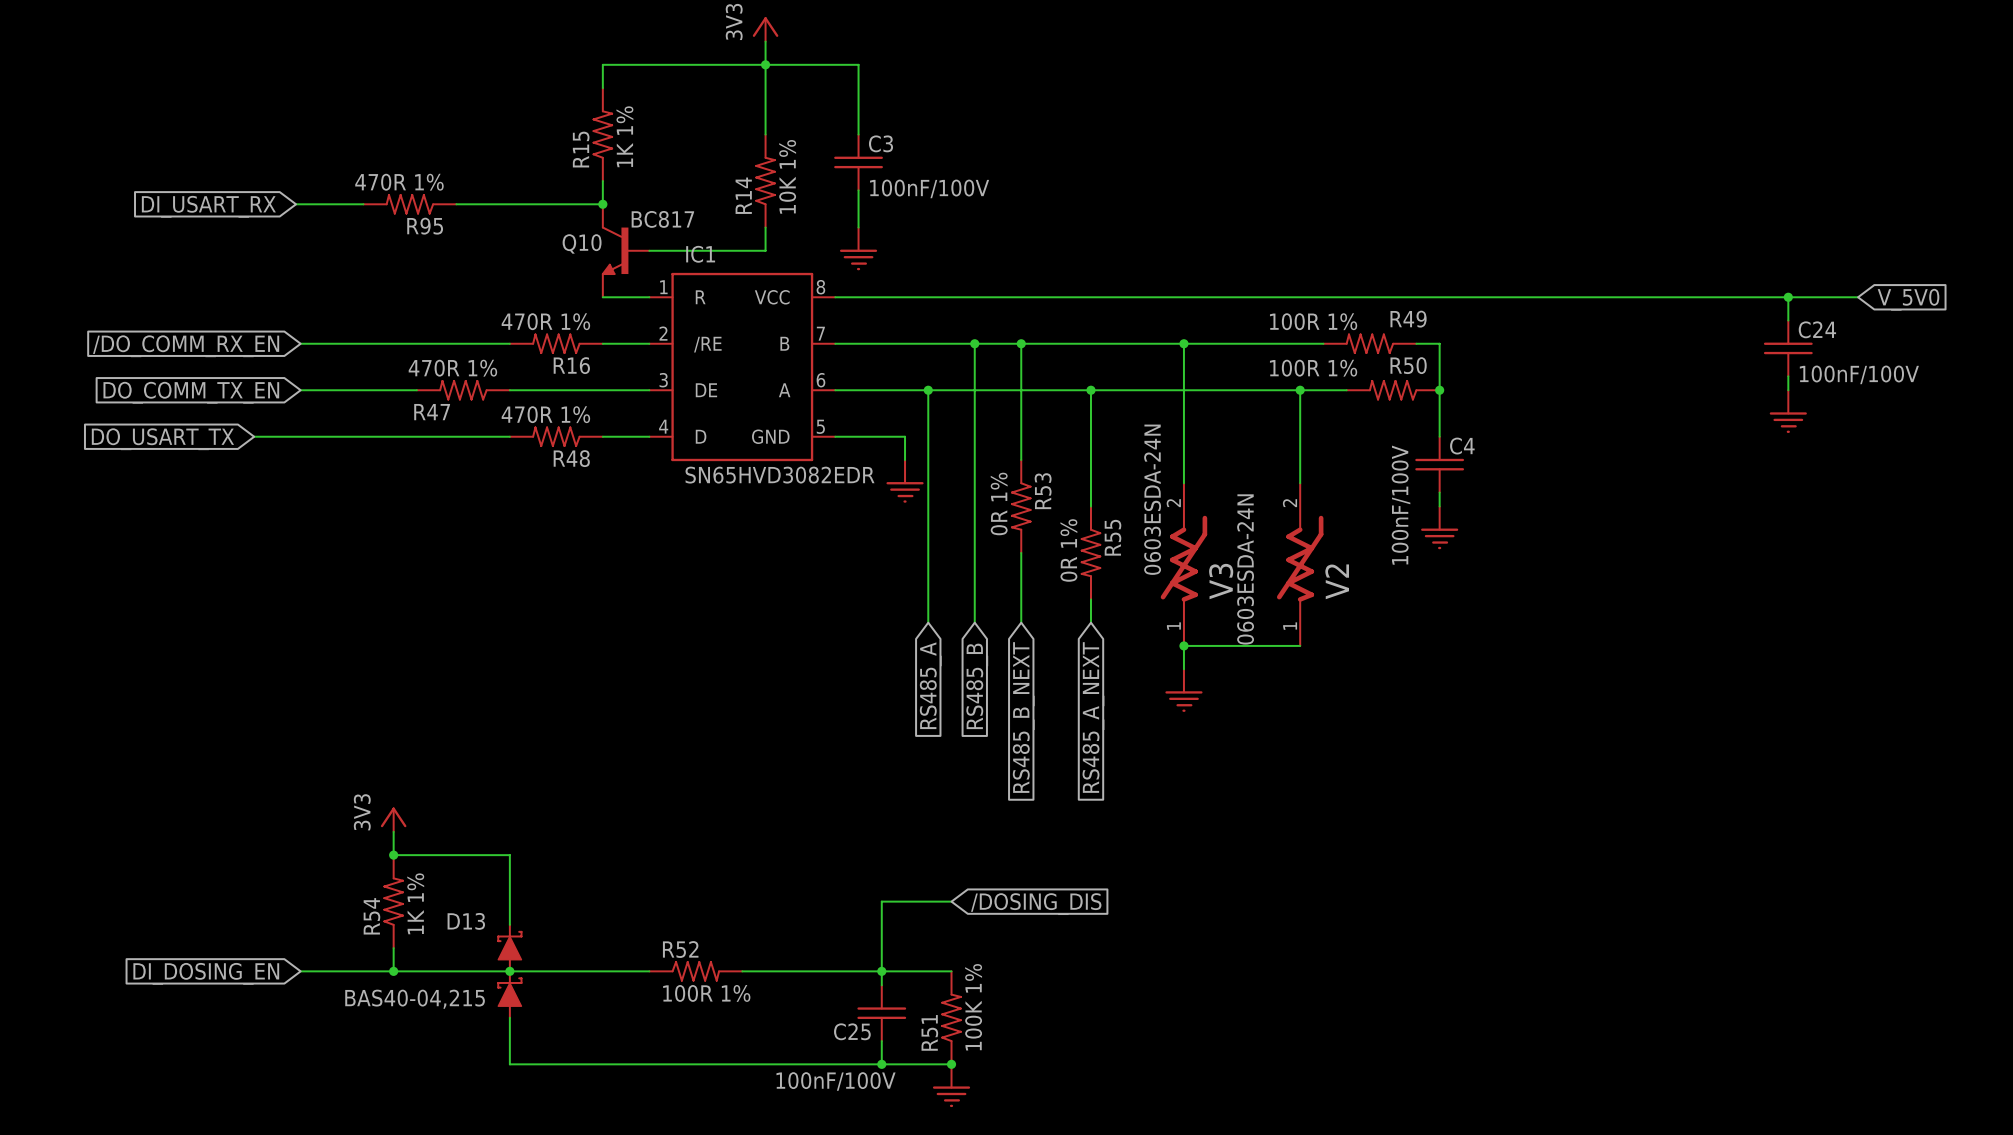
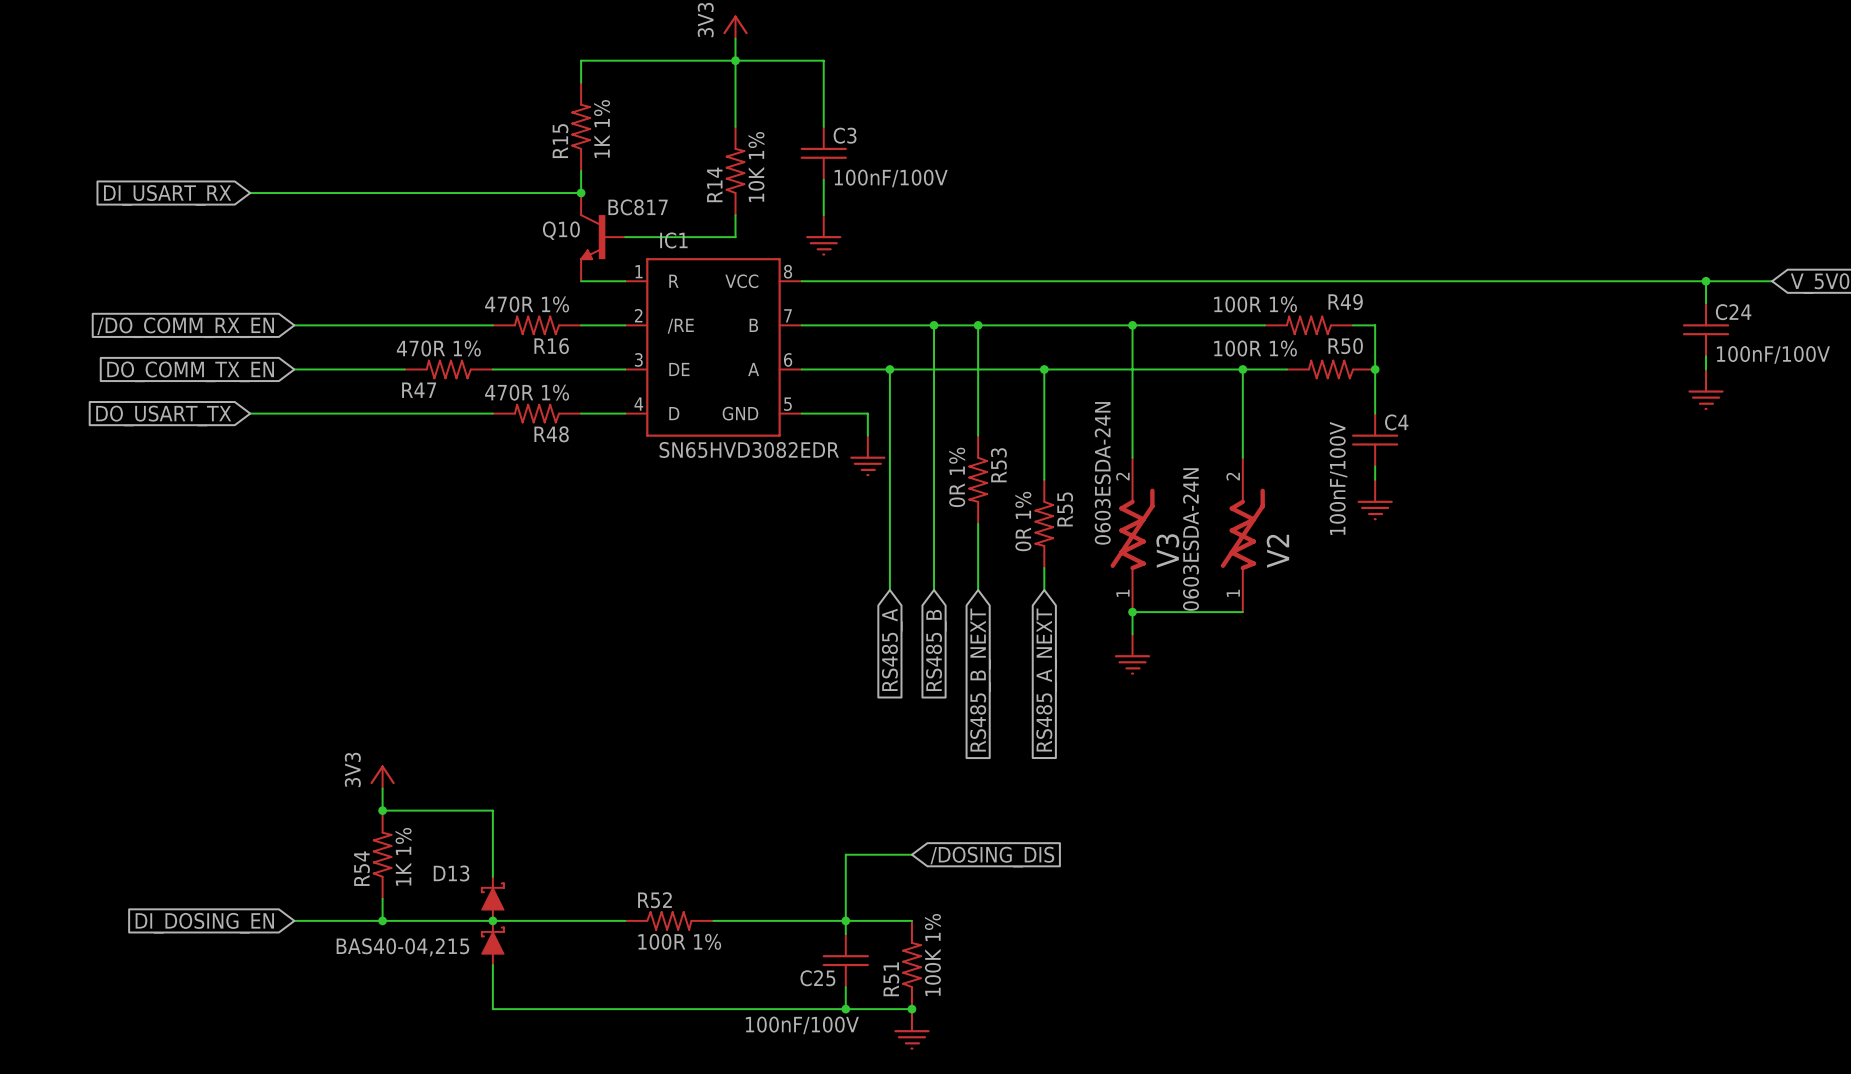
wire: none -> (250, 193) (289, 193)
R95: 470R 1% (409, 204) -> none
global label position: DI_USART_RX (208, 206) -> DI_USART_RX (167, 195)

